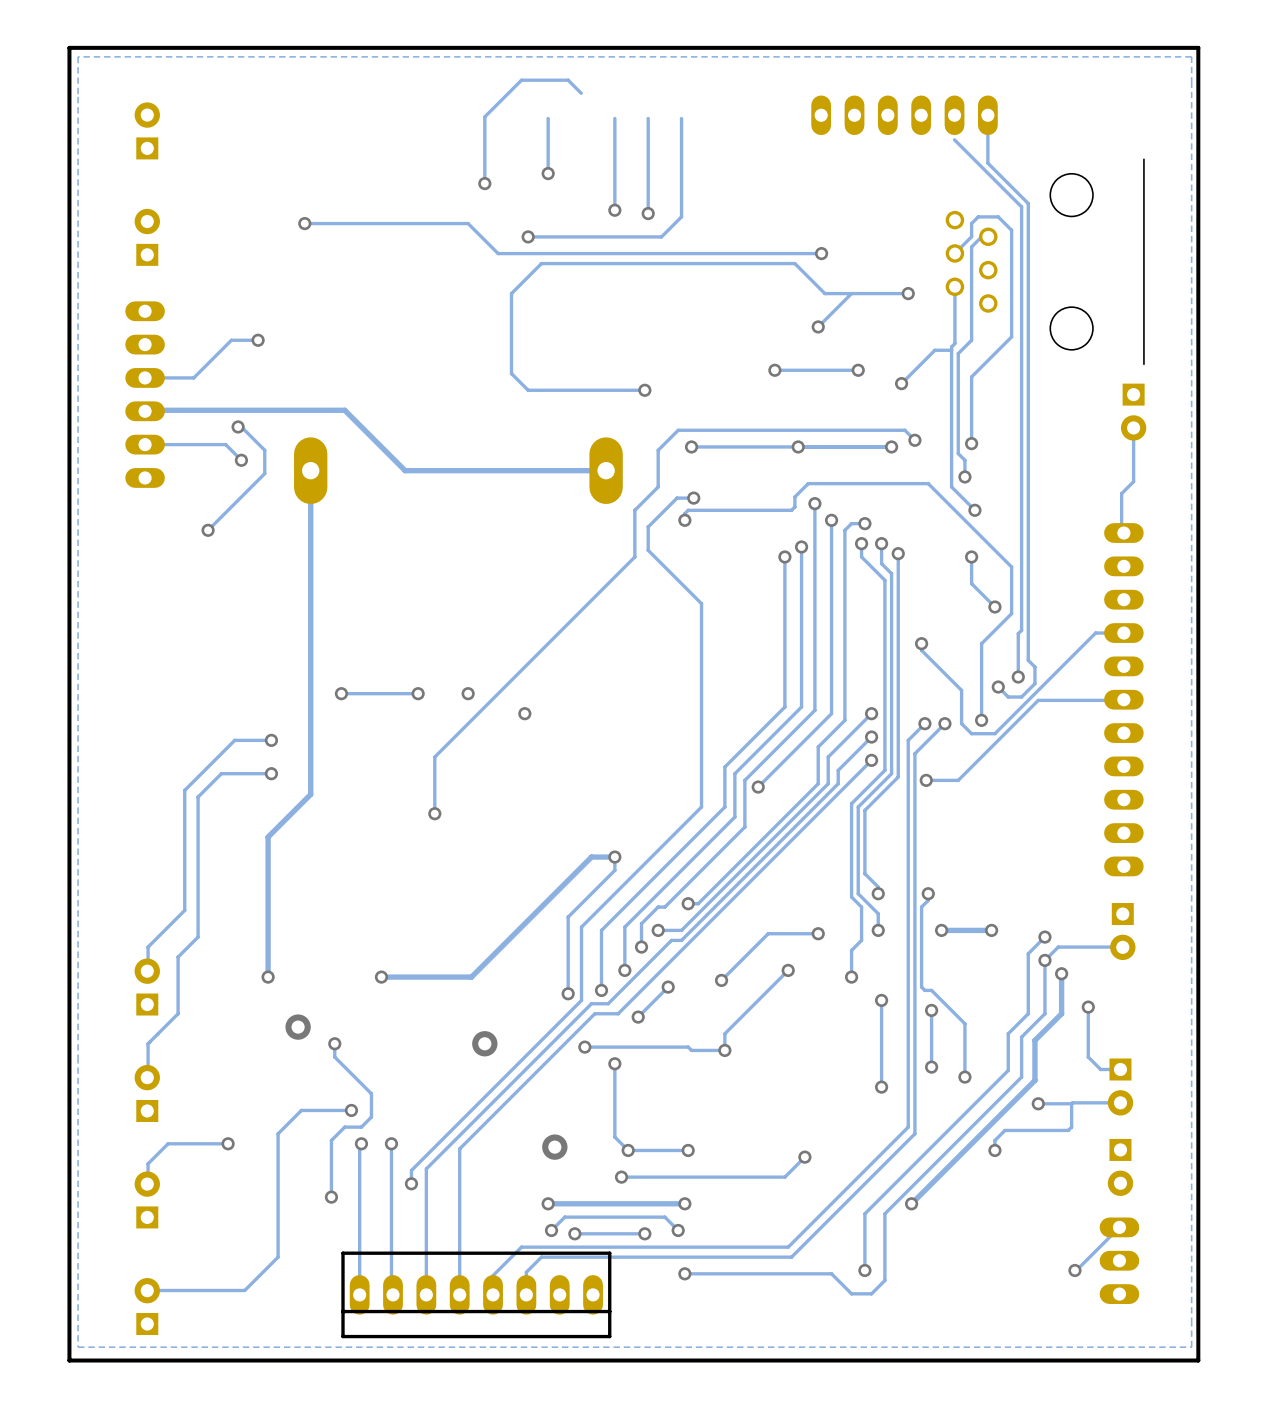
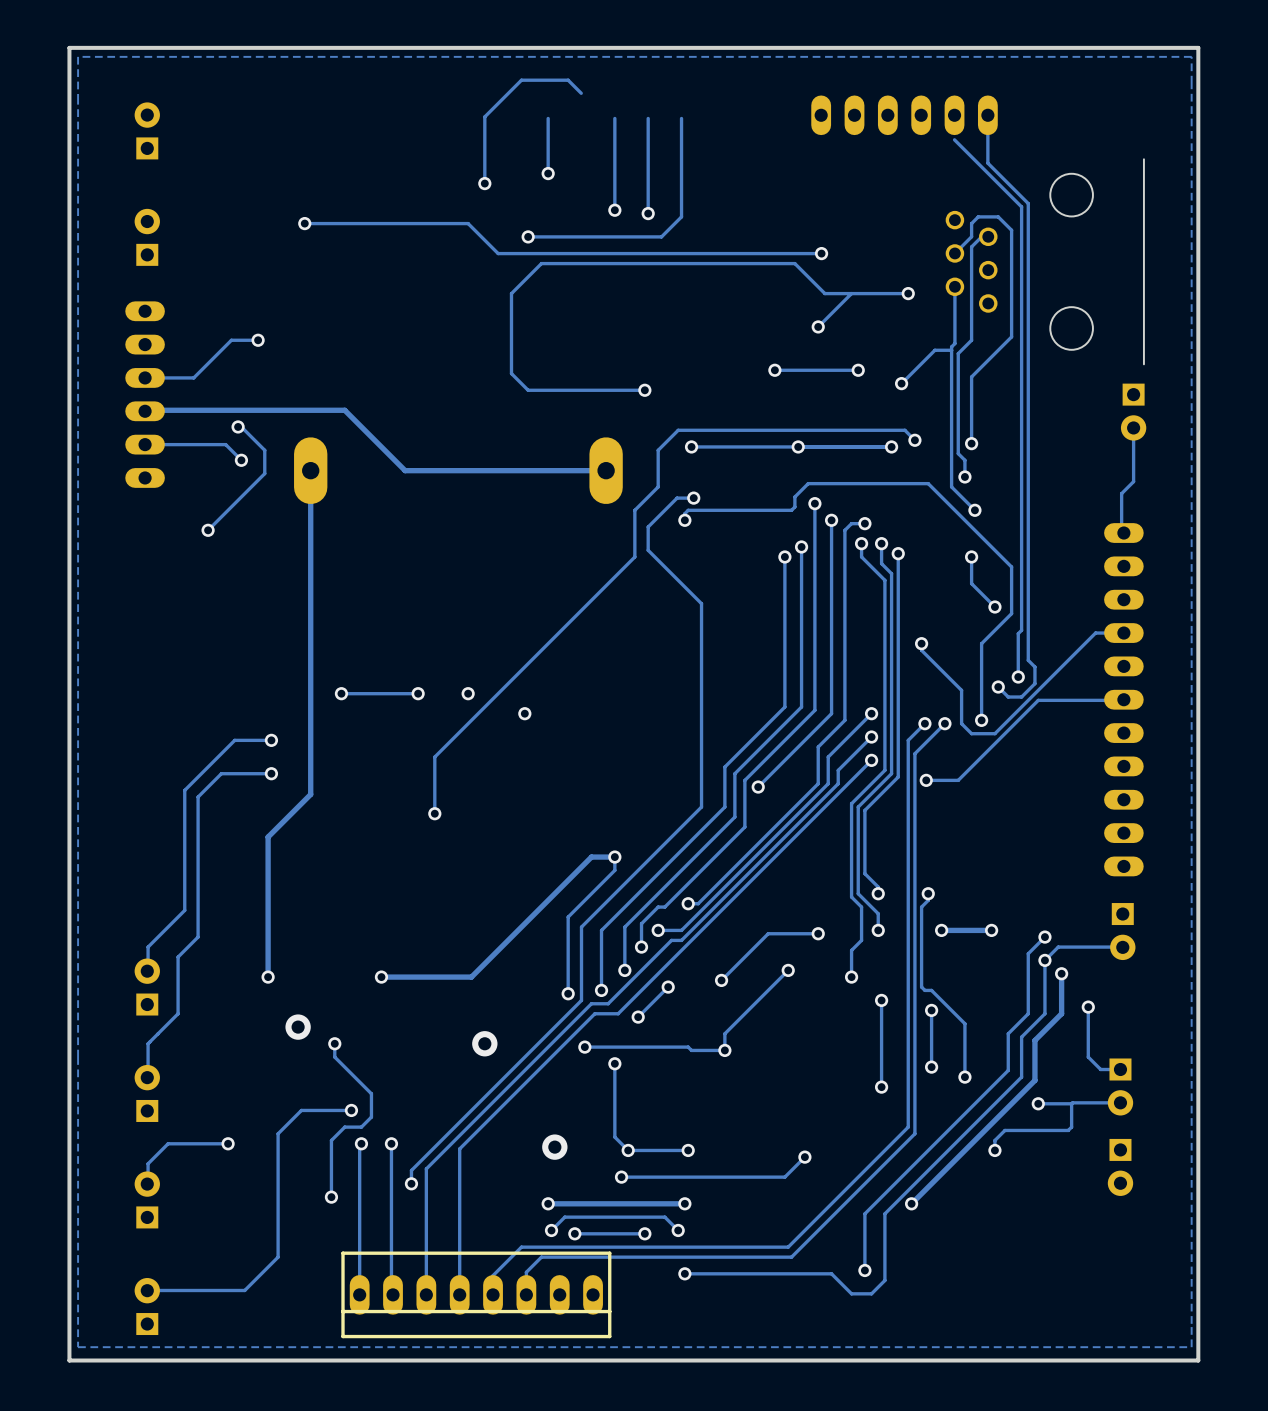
track: (1119, 1227) (1074, 1270) -> none
part: (1119, 1260) -> none
via: (1074, 1270) -> none

